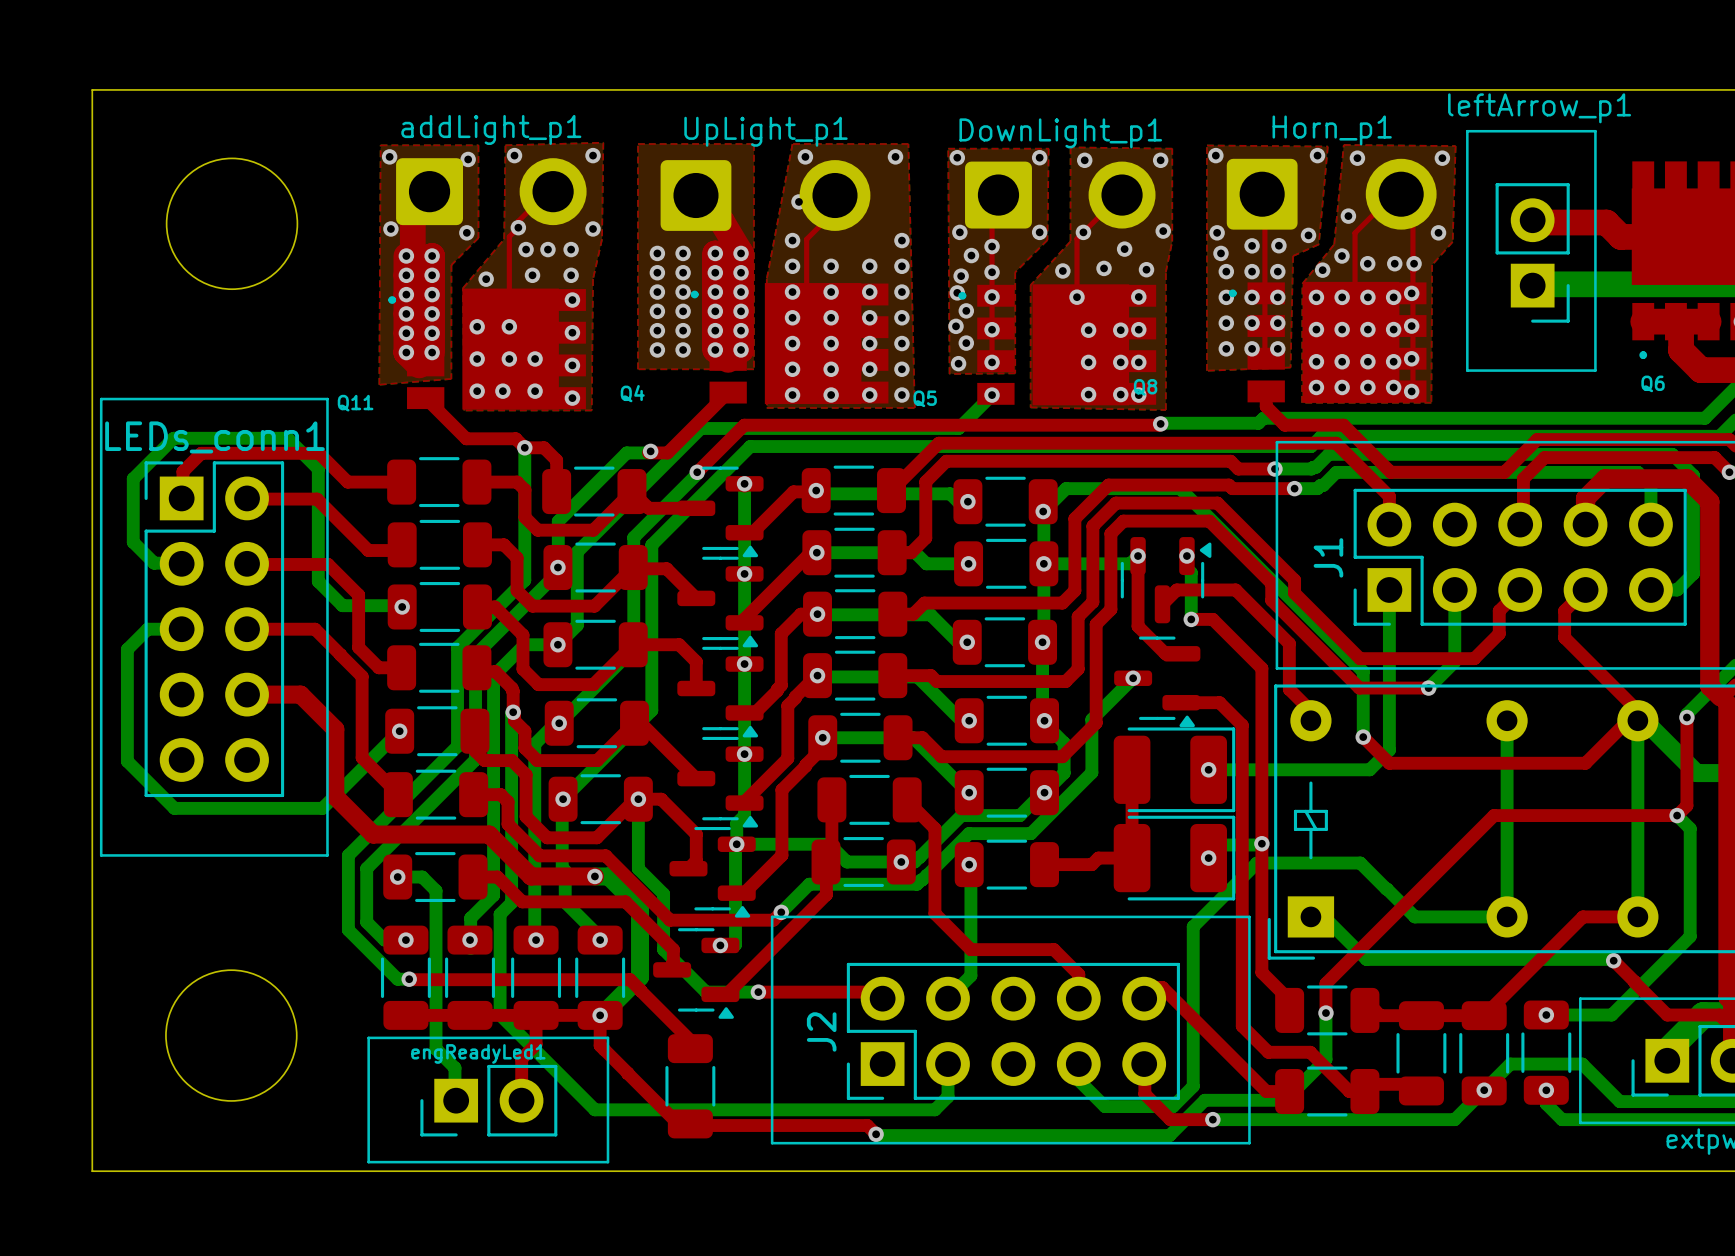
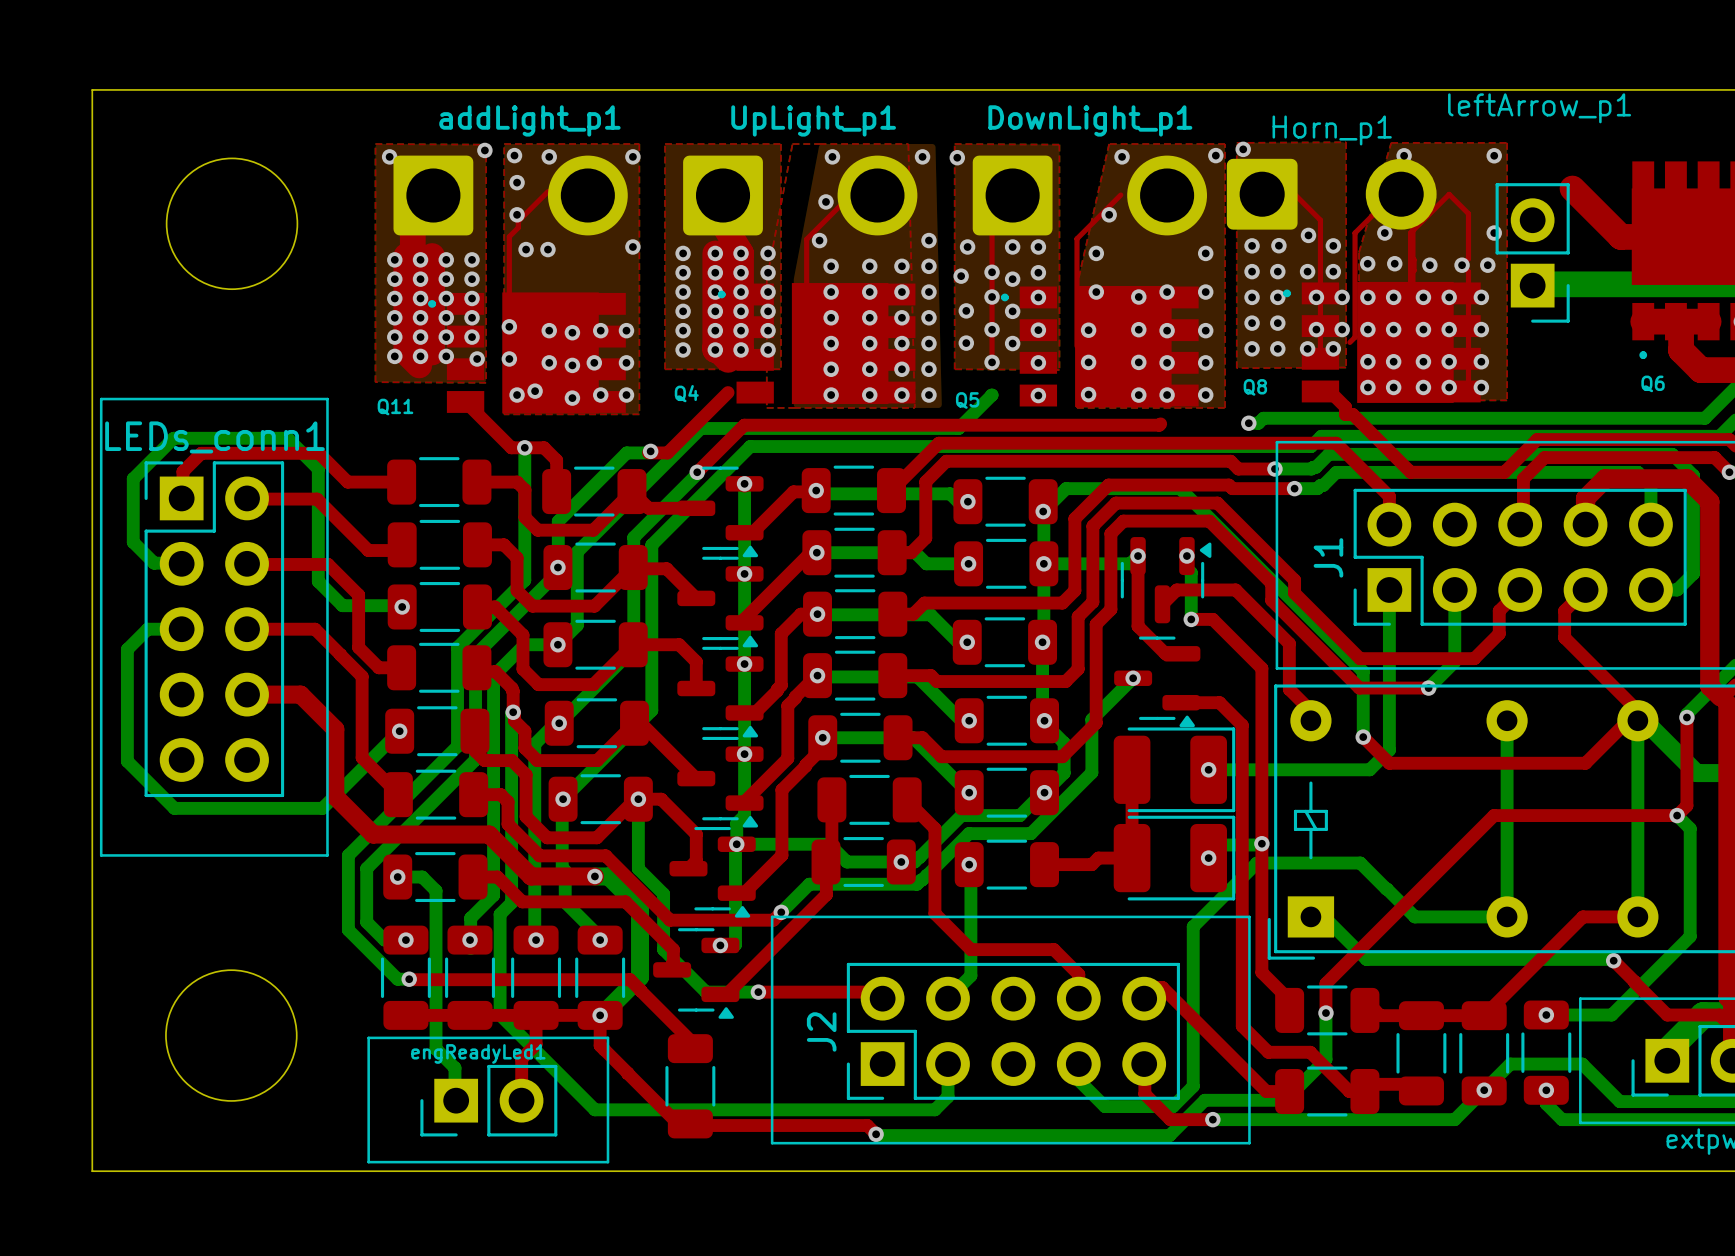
line: (1467, 131) (1595, 131) (1595, 370) (1467, 370) (1467, 131) -> none
top zone outline: (603, 142) (505, 145) (504, 239) (463, 288) (464, 410) (591, 410) (593, 279) (602, 239) (603, 142) -> none
top zone outline: none -> (1391, 142) (1507, 142) (1507, 400) (1359, 400) (1359, 252) (1391, 142)
top zone outline: (638, 144) (638, 369) (665, 369) -> (665, 144) (665, 369)
top zone outline: (639, 144) (665, 144) -> (639, 144) (639, 414) (504, 414) (504, 144) (638, 144)
top zone outline: (753, 144) (753, 369) -> (753, 144) (780, 144) (780, 369) (753, 369)
top zone outline: none -> (1109, 144) (1225, 144) (1225, 407) (1077, 407) (1077, 285) (1109, 144)
top zone outline: (1343, 144) (1334, 244) (1302, 283) (1302, 402) (1431, 402) (1432, 265) (1452, 241) (1455, 146) (1343, 144) -> none
top zone outline: (380, 145) (478, 145) (478, 237) (451, 265) (451, 378) (379, 384) (380, 145) -> (375, 144) (375, 382) (486, 382) (486, 144) (375, 144)
top zone outline: (1207, 145) (1207, 370) (1290, 367) (1293, 256) (1318, 244) (1327, 146) (1207, 145) -> (1346, 142) (1236, 142) (1236, 368) (1346, 367) (1346, 142)
top zone outline: (1070, 147) (1172, 148) (1172, 241) (1165, 272) (1165, 410) (1030, 407) (1030, 285) (1070, 241) (1070, 147) -> none
top zone outline: (948, 148) (1048, 148) (1047, 240) (1015, 272) (1015, 373) (949, 373) (948, 148) -> (954, 144) (954, 369) (1059, 369) (1059, 144) (954, 144)
via: none -> (1243, 149)
via: (593, 155) -> none
via: (1317, 155) -> none
via: none -> (1404, 155)
via: none -> (1494, 155)
via: none -> (549, 156)
via: none -> (632, 156)
via: (805, 156) -> none
via: none -> (832, 156)
via position: (895, 156) -> (922, 156)
via: none -> (1122, 156)
via: (1039, 157) -> none
addLight_p1 footprint: [396, 158, 587, 226] -> [393, 155, 628, 236]
via: (1357, 158) -> none
via: (1442, 158) -> none
via position: (468, 159) -> (484, 150)
UpLight_p1 footprint: [660, 160, 871, 231] -> [683, 155, 918, 236]
via: (1084, 160) -> none
via: (1160, 160) -> none
DownLight_p1 footprint: [965, 161, 1156, 229] -> [972, 155, 1208, 236]
via: none -> (517, 182)
top track: (1262, 194) (1262, 198) (1258, 201) (1258, 213) (1264, 220) (1264, 358) -> none
top track: none -> (1294, 194) (1320, 220) (1320, 358)
via: (798, 201) -> none
via: none -> (825, 201)
via: none -> (1109, 214)
via: (1348, 216) -> none
top track: (1532, 220) (1534, 222) (1606, 222) -> (1572, 188) (1606, 222)
via position: (518, 227) -> (517, 214)
via: (390, 228) -> none
via: (593, 228) -> none
via: (1163, 231) -> none
via: (466, 232) -> none
via: (959, 232) -> none
via position: (1039, 232) -> (1038, 246)
via: (1083, 232) -> none
via: (1217, 232) -> none
via: (1438, 232) -> none
via: none -> (1384, 233)
via: none -> (1494, 233)
via: (792, 240) -> none
via: none -> (819, 240)
via: (901, 240) -> none
via: none -> (928, 240)
via: none -> (632, 246)
via: none -> (967, 246)
via: (992, 246) -> none
via: none -> (1012, 246)
via: (571, 249) -> none
via: (1124, 249) -> none
via: (657, 253) -> none
via: none -> (768, 253)
via position: (1220, 253) -> (1205, 253)
via: (971, 255) -> none
via: (406, 256) -> none
via: (432, 256) -> none
via position: (1341, 256) -> (1333, 245)
via: none -> (394, 259)
via: none -> (420, 259)
via: none -> (446, 259)
via: none -> (472, 259)
via position: (1414, 263) -> (1429, 265)
via: none -> (1462, 265)
via: none -> (1487, 265)
via: (792, 266) -> none
via: none -> (928, 266)
via position: (1104, 268) -> (1096, 253)
via: (1146, 269) -> none
via: (1322, 270) -> none
via: (1062, 271) -> none
via: (1226, 271) -> none
via: none -> (1307, 271)
via: none -> (1333, 271)
via: (657, 272) -> none
via: none -> (768, 272)
via: none -> (1038, 272)
via: (406, 275) -> none
via: (432, 275) -> none
via: (532, 275) -> none
via: (571, 275) -> none
via: none -> (394, 279)
via: none -> (420, 279)
via: none -> (446, 279)
via position: (486, 279) -> (472, 279)
via: none -> (1012, 279)
via: (657, 292) -> none
via: none -> (768, 292)
via: (792, 292) -> none
via: none -> (928, 292)
via: (957, 292) -> none
via: none -> (1096, 292)
via: none -> (1167, 292)
via: none -> (1205, 292)
via position: (1411, 293) -> (1423, 297)
via: (406, 294) -> none
via: (432, 294) -> none
via: none -> (1038, 297)
via: (1077, 297) -> none
via: (1226, 297) -> none
via: none -> (1449, 297)
via: none -> (1481, 297)
via: none -> (394, 298)
via: none -> (420, 298)
via: none -> (446, 298)
via: none -> (472, 298)
via: (572, 300) -> none
via: (657, 311) -> none
via: none -> (768, 311)
via: none -> (1012, 311)
via: (406, 313) -> none
via: (432, 313) -> none
via: none -> (394, 317)
via: none -> (420, 317)
via: none -> (446, 317)
via: none -> (472, 317)
via: (792, 317) -> none
via: none -> (928, 317)
via: (1226, 323) -> none
via: (477, 326) -> none
via: (956, 326) -> none
via position: (1411, 326) -> (1423, 329)
via: none -> (1449, 329)
via: none -> (1481, 329)
via: none -> (549, 330)
via: none -> (600, 330)
via: none -> (626, 330)
via: (657, 330) -> none
via: none -> (768, 330)
via: none -> (1038, 330)
via: (1120, 330) -> none
via: none -> (1167, 330)
via: none -> (1205, 330)
via: (406, 333) -> none
via: (432, 333) -> none
via: none -> (394, 337)
via: none -> (420, 337)
via: none -> (446, 337)
via: none -> (472, 337)
Q8 position: (1327, 342) -> (1381, 342)
top track: none -> (1405, 342) (1410, 337) (1410, 233) (1449, 194) (1468, 213) (1468, 258) (1462, 265) (1468, 271) (1467, 391)
Q4 position: (789, 343) -> (816, 343)
via: (792, 343) -> none
via: none -> (928, 343)
via: none -> (1012, 343)
Q5 position: (1057, 344) -> (1099, 346)
via: (1226, 348) -> none
Q11 position: (487, 349) -> (527, 352)
via: (657, 349) -> none
via: none -> (768, 349)
via: (406, 352) -> none
via: (432, 352) -> none
via: none -> (394, 356)
via: none -> (420, 356)
via: none -> (446, 356)
via position: (535, 358) -> (549, 362)
via position: (1411, 358) -> (1423, 361)
via position: (1316, 361) -> (1307, 348)
via position: (1342, 361) -> (1333, 348)
via: none -> (1449, 361)
via: none -> (1481, 361)
via: none -> (594, 362)
via: none -> (626, 362)
via: none -> (1038, 362)
via: (1120, 362) -> none
via: none -> (1167, 362)
via: none -> (1205, 362)
via: (958, 363) -> none
via: (792, 369) -> none
via: none -> (928, 369)
Q8 name position: Q8 (1145, 387) -> Q8 (1255, 387)
via: (1316, 387) -> none
via: (1342, 387) -> none
via: none -> (1449, 387)
via: none -> (1481, 387)
via: (477, 391) -> none
via position: (502, 391) -> (517, 395)
top track: (1266, 391) (1266, 406) (1284, 425) (1343, 425) (1390, 472) (1410, 472) -> (1320, 391) (1329, 391) (1345, 407) (1345, 414) (1352, 414) (1410, 472)
via position: (1411, 391) -> (1423, 387)
Q4 name position: Q4 (632, 393) -> Q4 (686, 393)
via: (1120, 394) -> none
via: none -> (600, 395)
via: none -> (626, 395)
via: (792, 395) -> none
via: none -> (928, 395)
via: (992, 395) -> none
via: none -> (1038, 395)
via: none -> (1167, 395)
via: none -> (1205, 395)
top track: (425, 398) (466, 438) (515, 438) (524, 447) -> (465, 401) (511, 447) (524, 447)
via: (1160, 423) -> none
bottom track: (1248, 423) (1160, 423) -> none
via: none -> (1248, 423)

